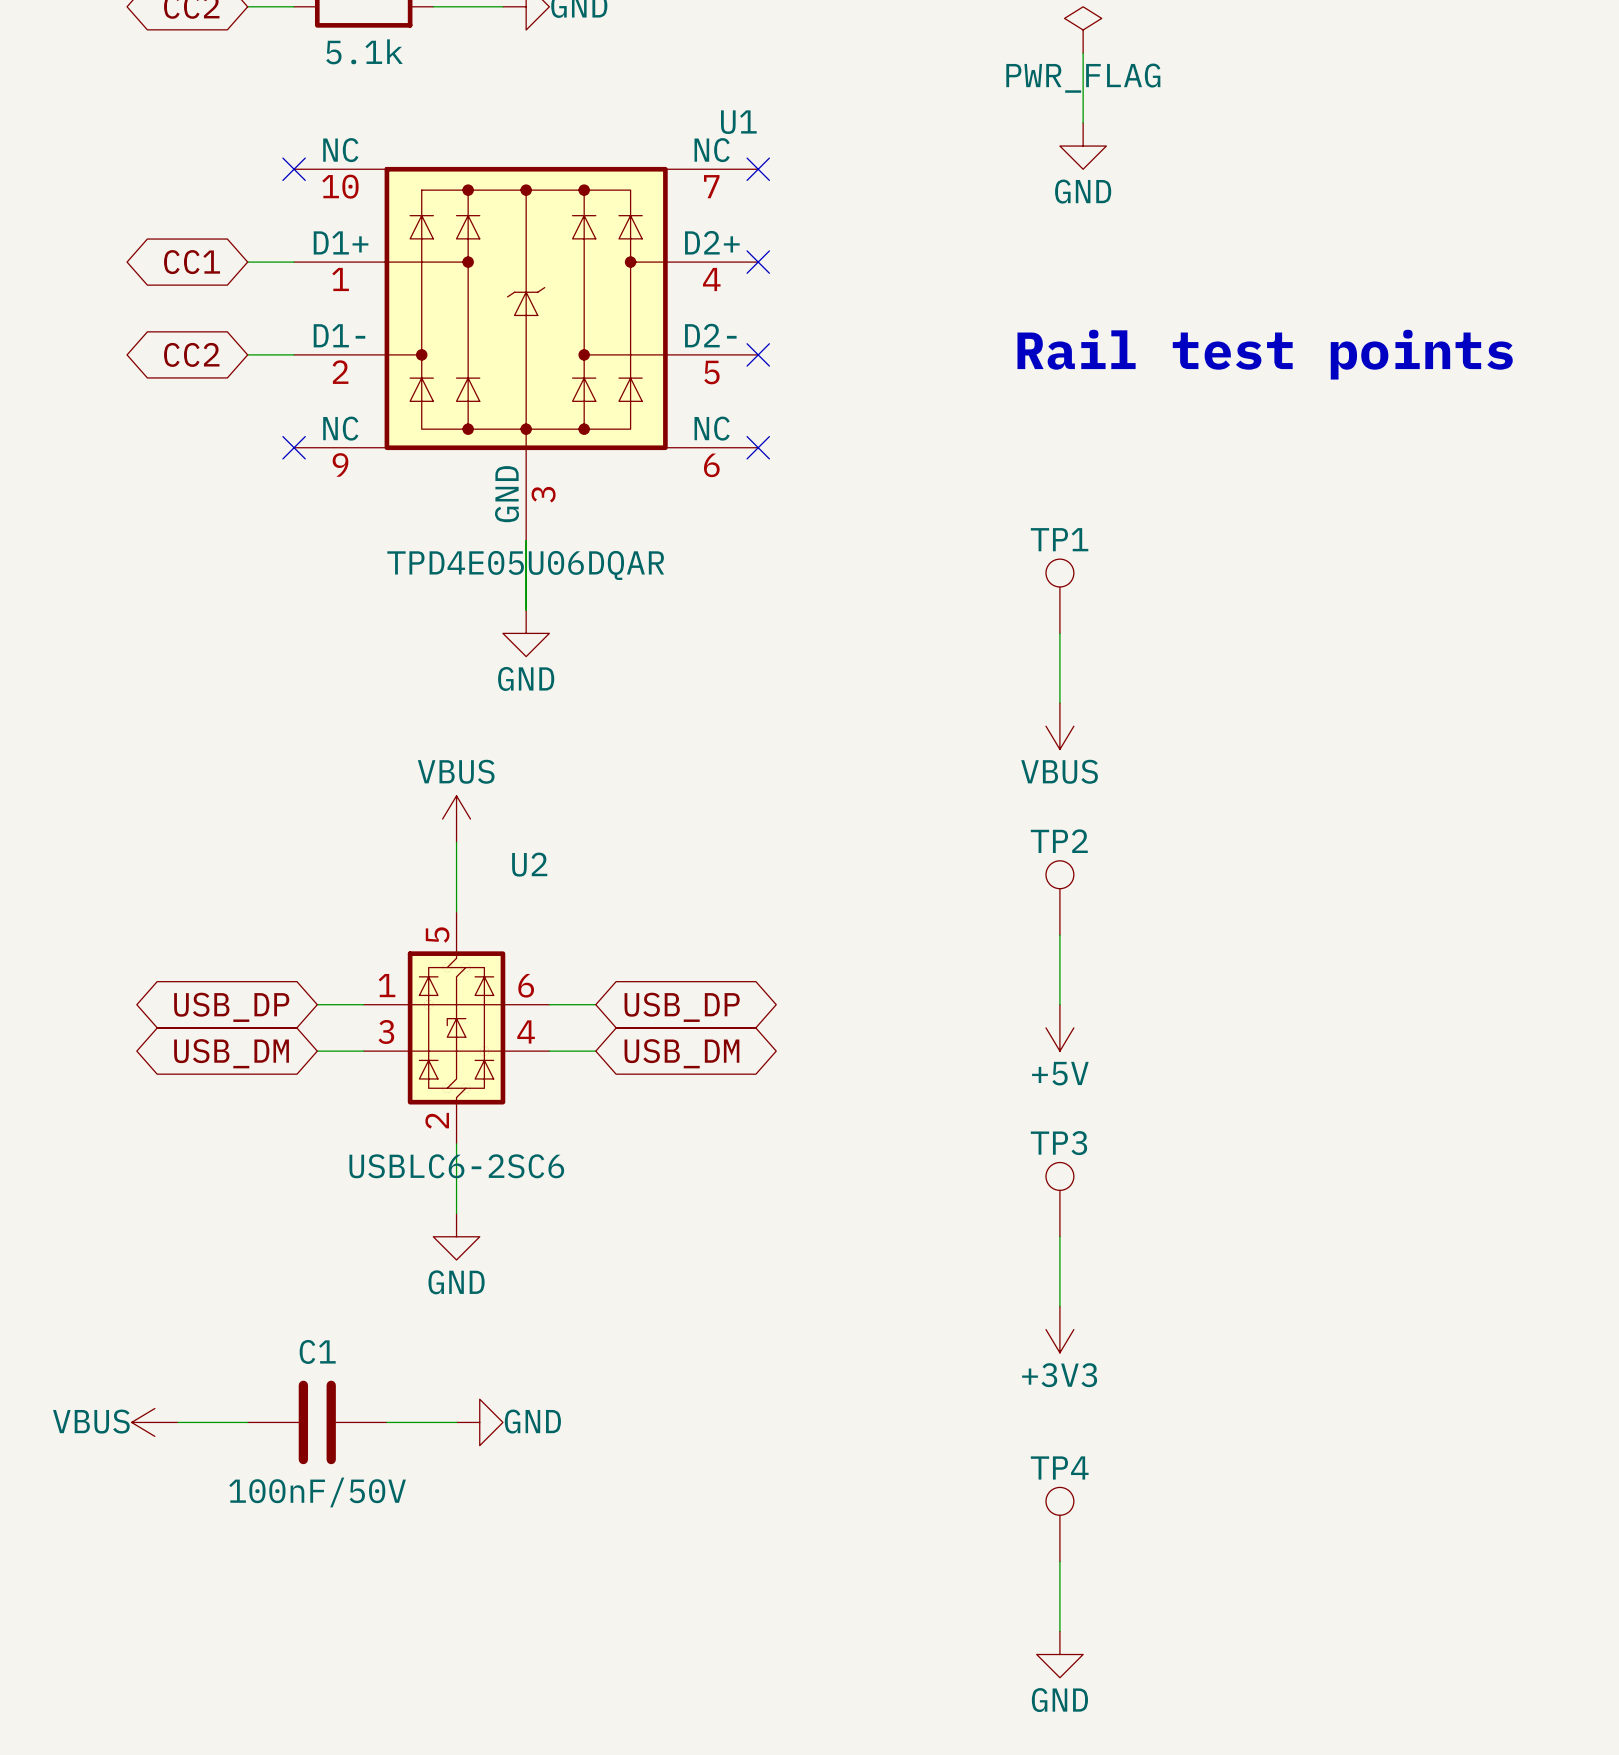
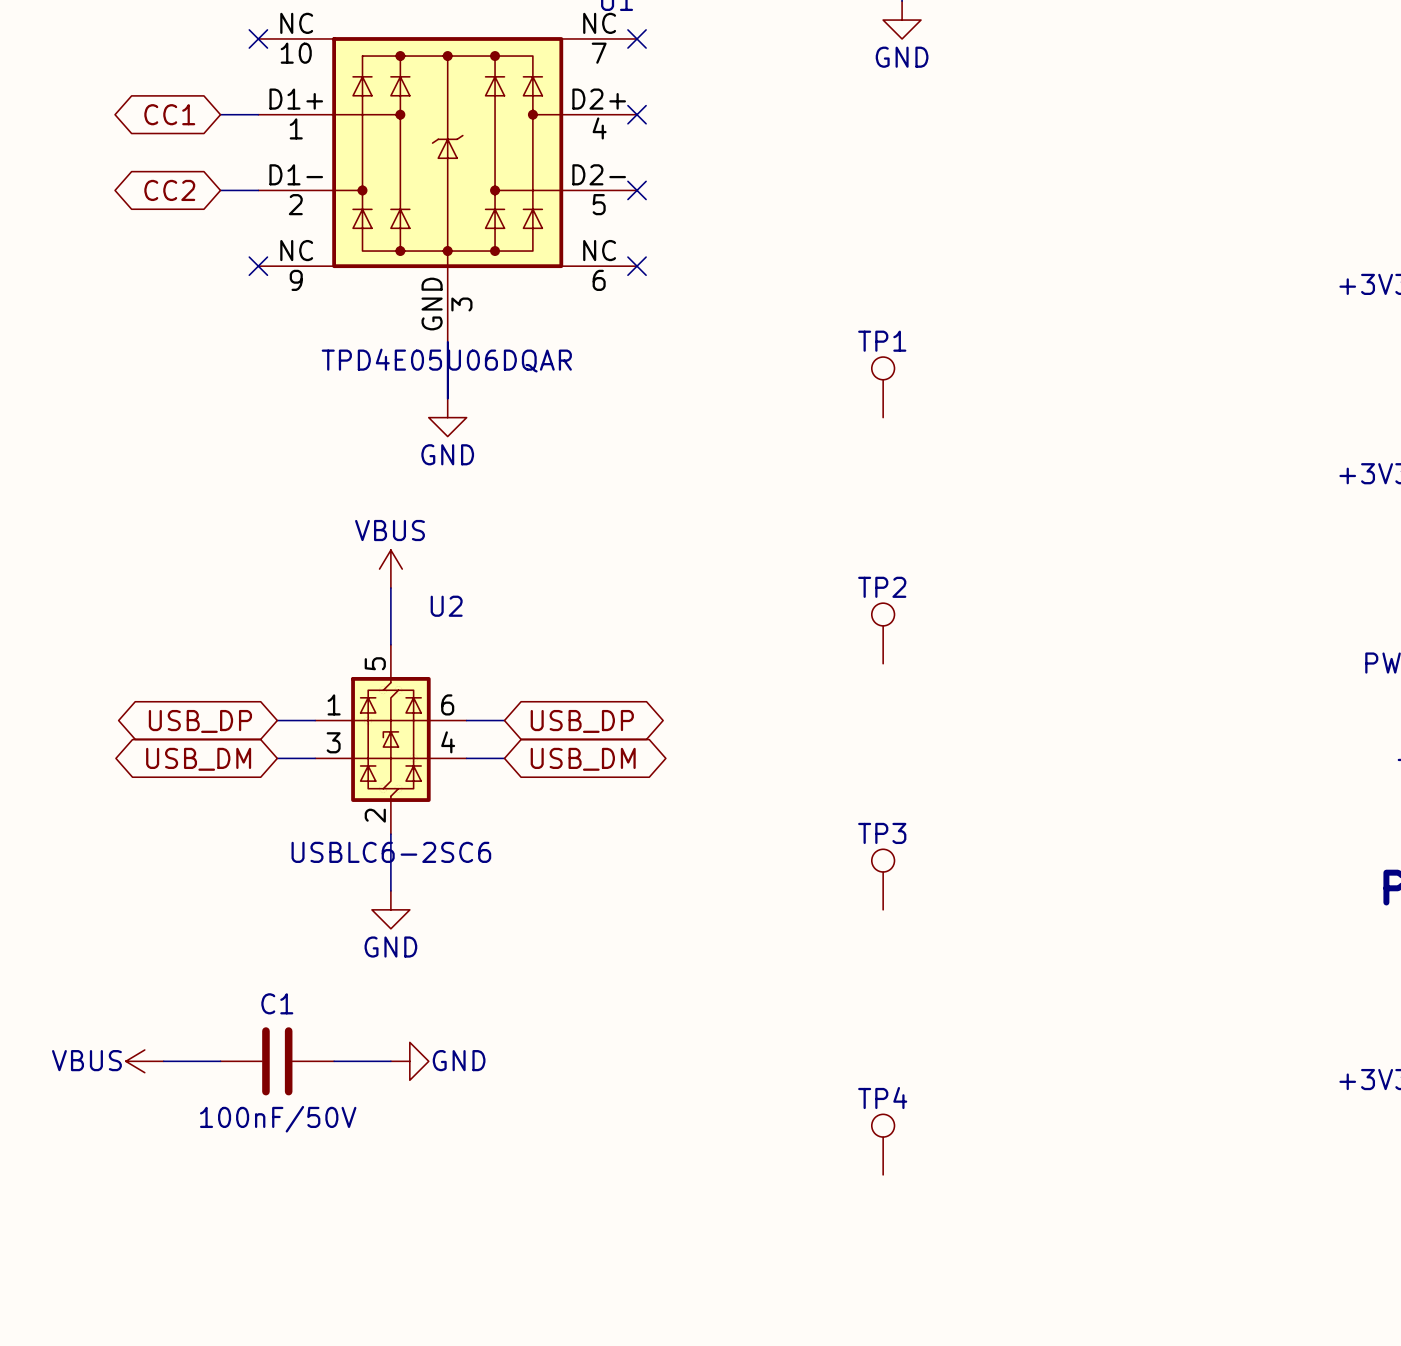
text: Rail test points (1265, 354) -> none
wire: (1059, 633) (1059, 703) -> none
power symbol: VBUS (1059, 726) -> none
wire: (1059, 935) (1059, 1004) -> none
power symbol: +5V (1059, 1027) -> none
wire: (1059, 1236) (1059, 1306) -> none
power symbol: +3V3 (1059, 1329) -> none
wire: (1059, 1561) (1059, 1631) -> none
power symbol: GND (1059, 1654) -> none

